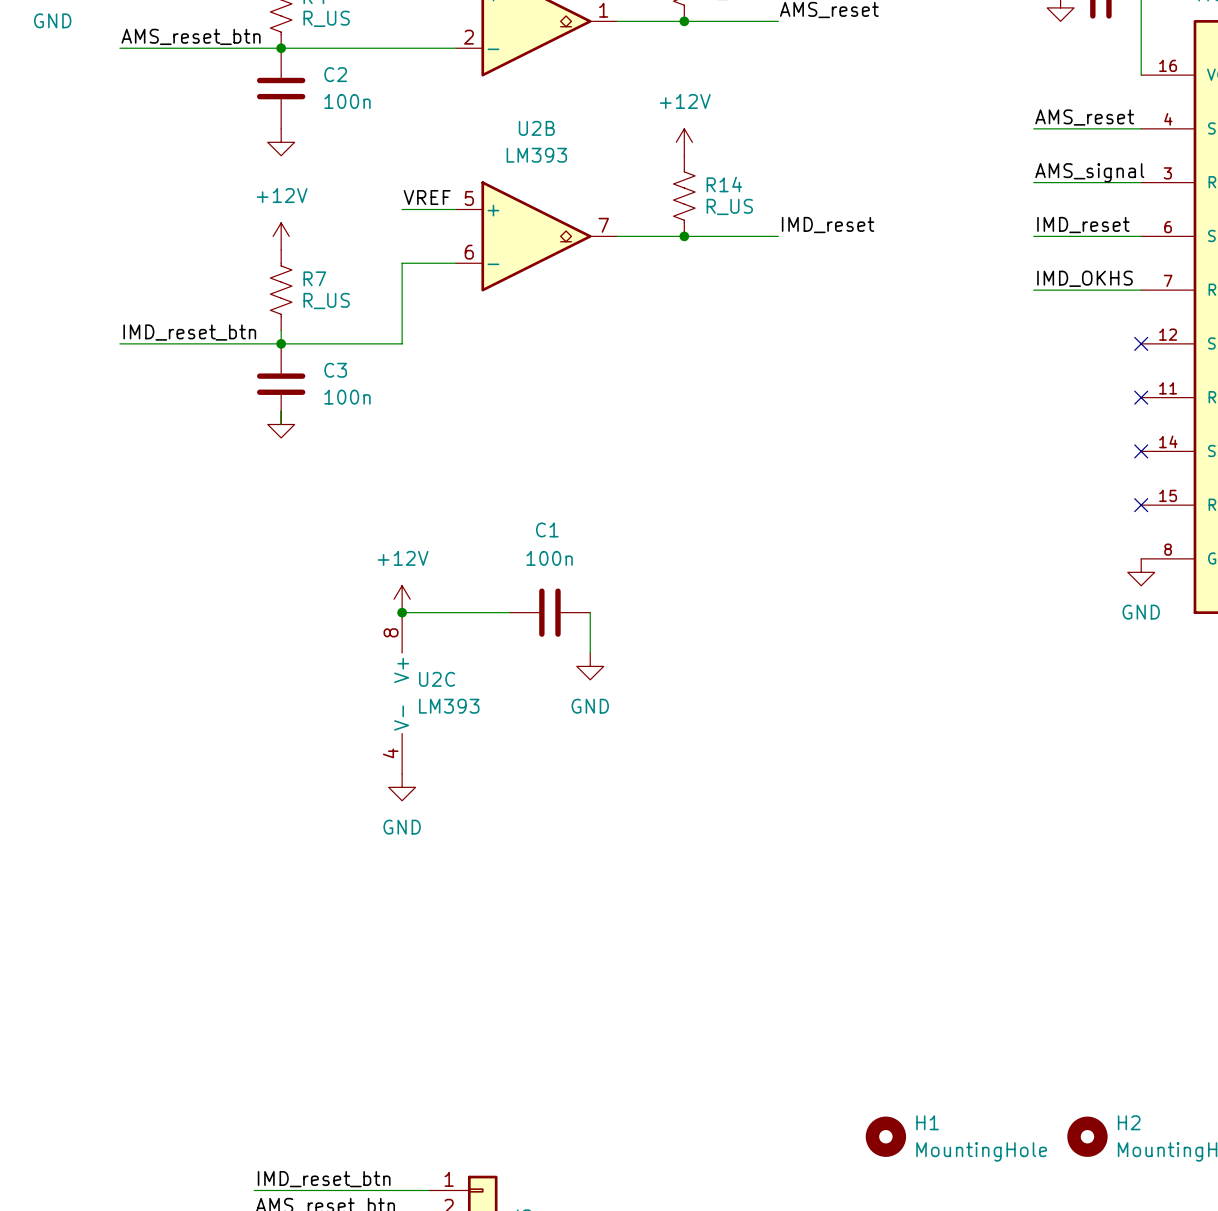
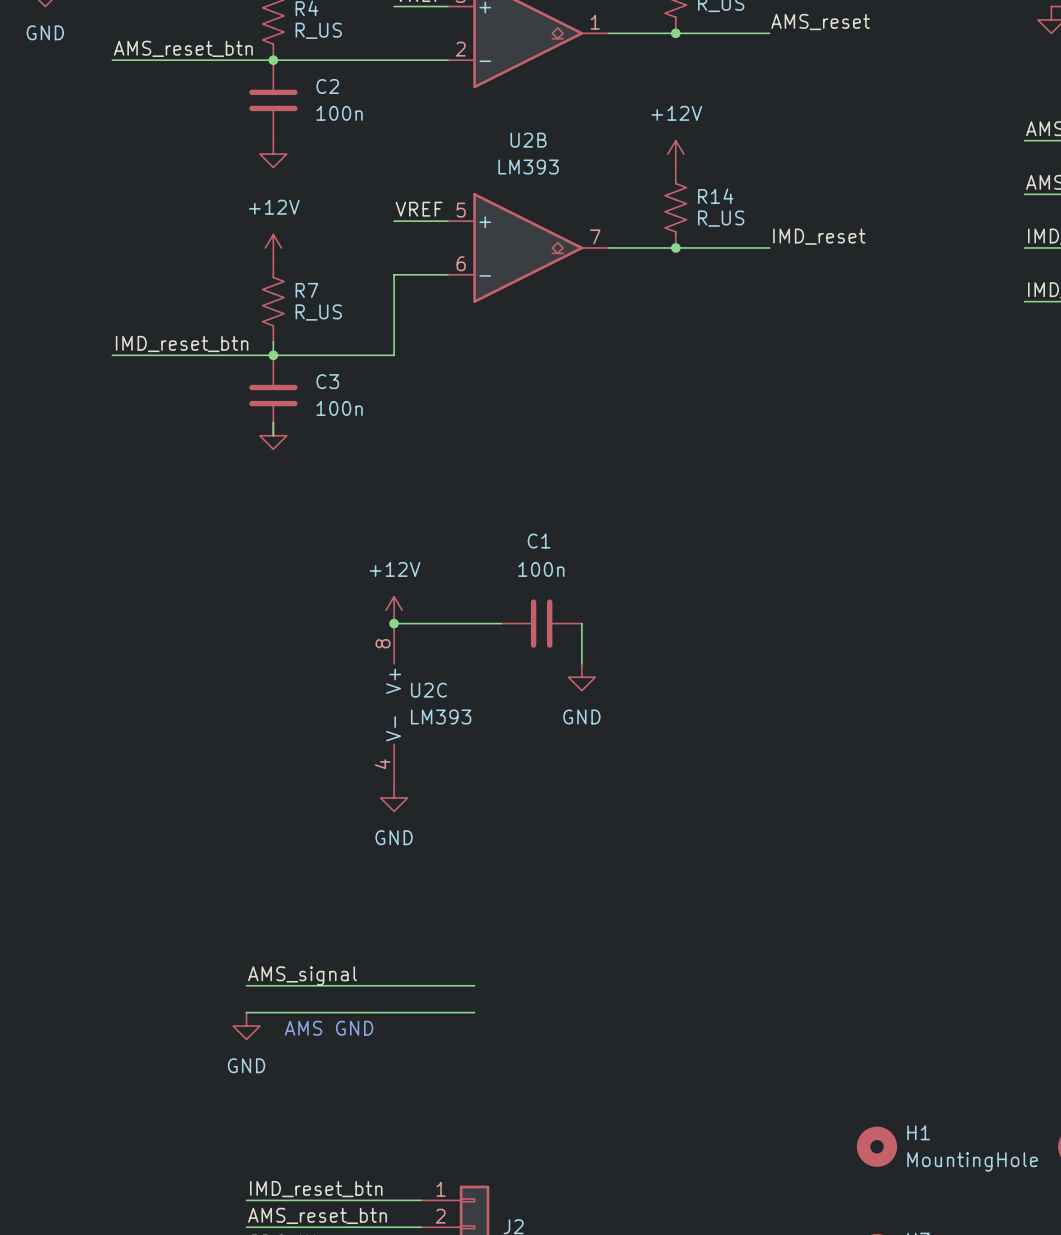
label: none -> AMS_signal (302, 976)
wire: none -> (246, 985) (474, 985)
wire: none -> (246, 1012) (474, 1012)
power symbol: none -> GND (246, 1026)
text: none -> AMS GND (329, 1028)

